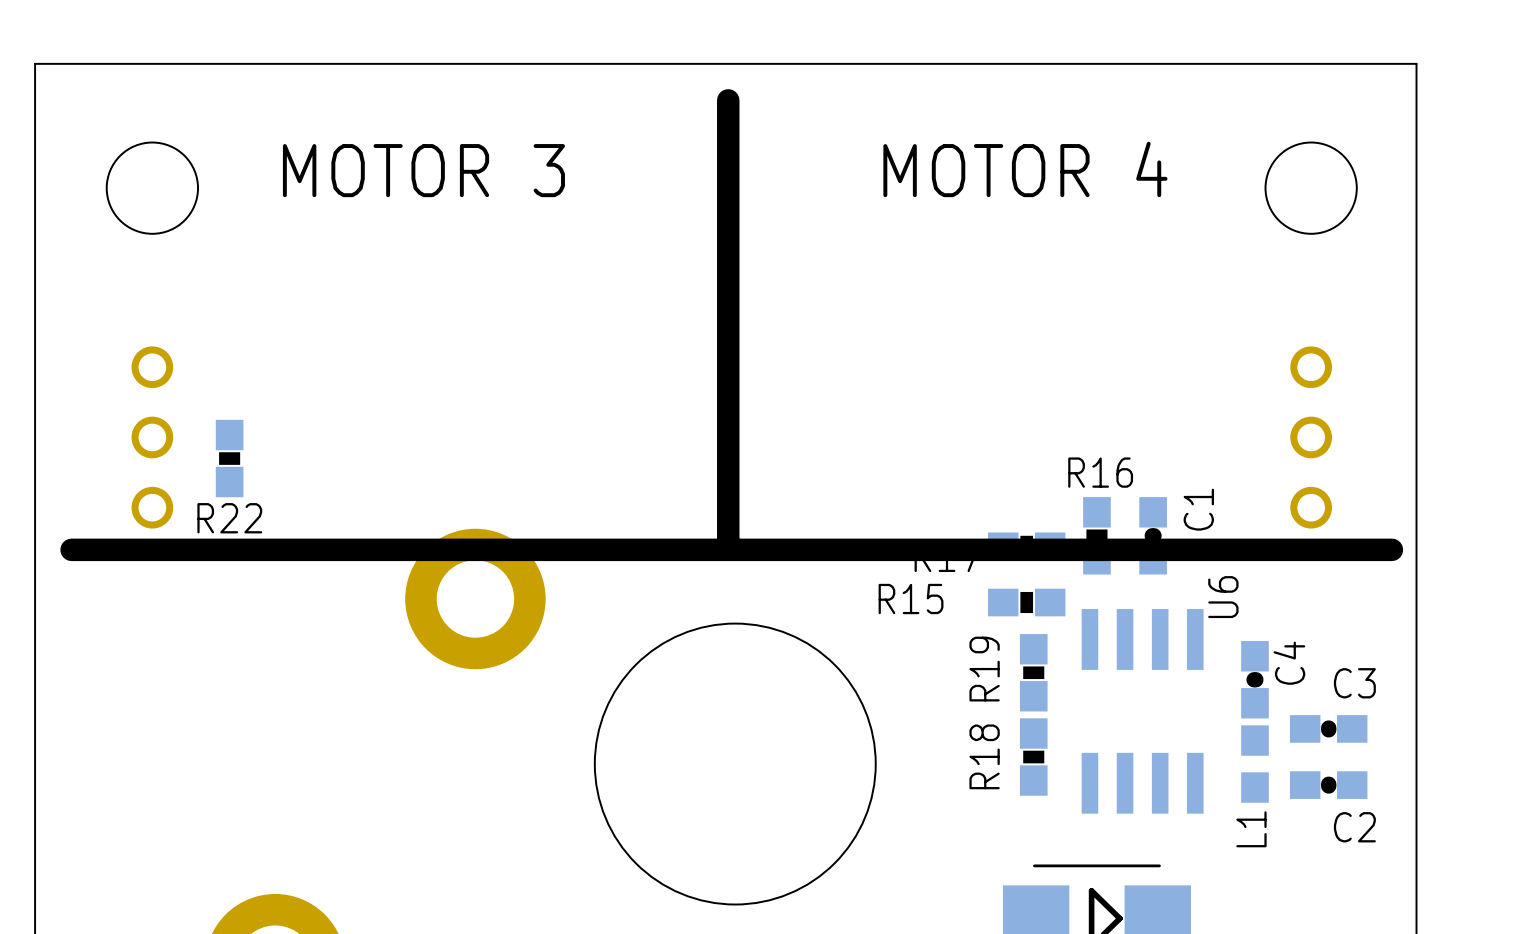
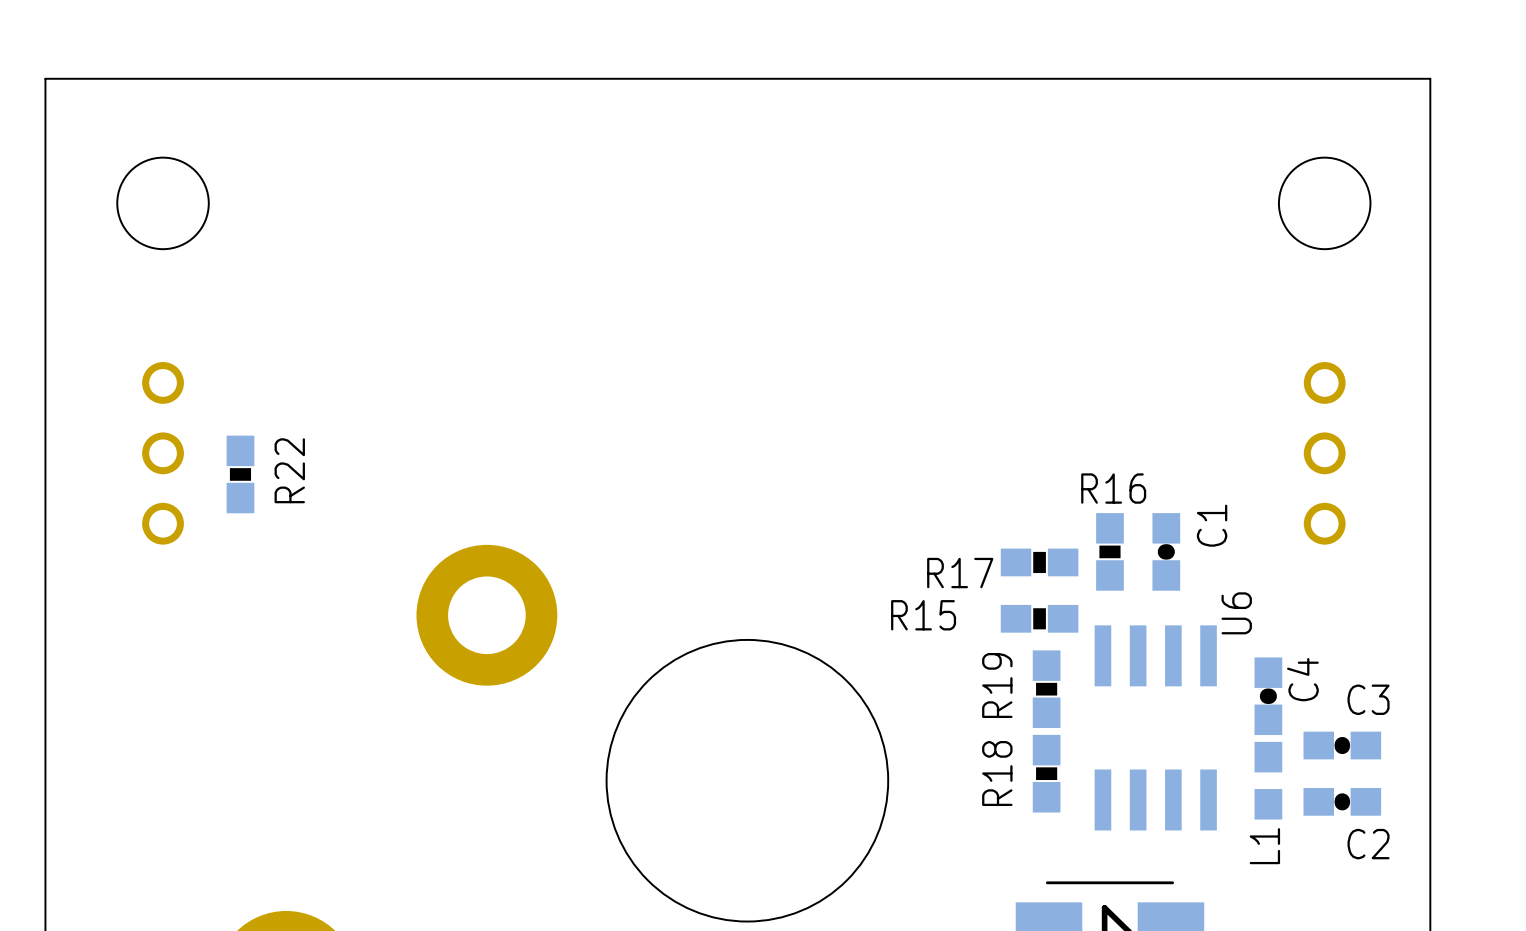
line: (728, 100) (728, 549) -> none
text: MOTOR 4 (1025, 169) -> none
text: MOTOR 3 (423, 170) -> none
R22 name rotation: 0° (229, 518) -> 90° counterclockwise (289, 470)
line: (1391, 549) (71, 549) -> none

